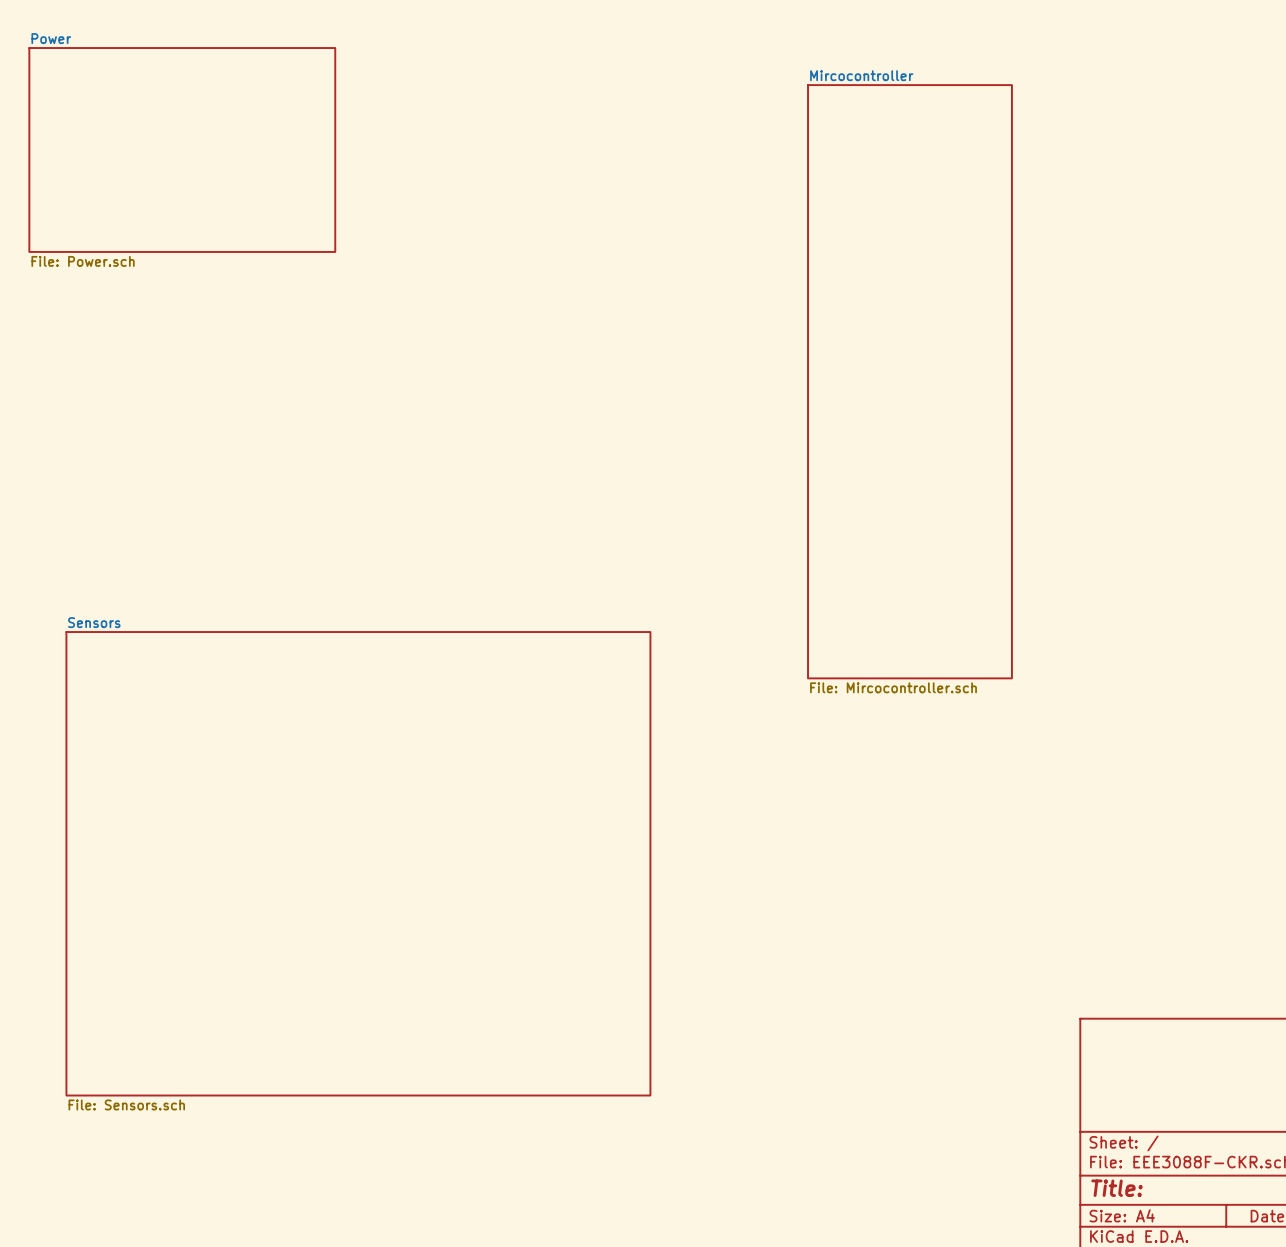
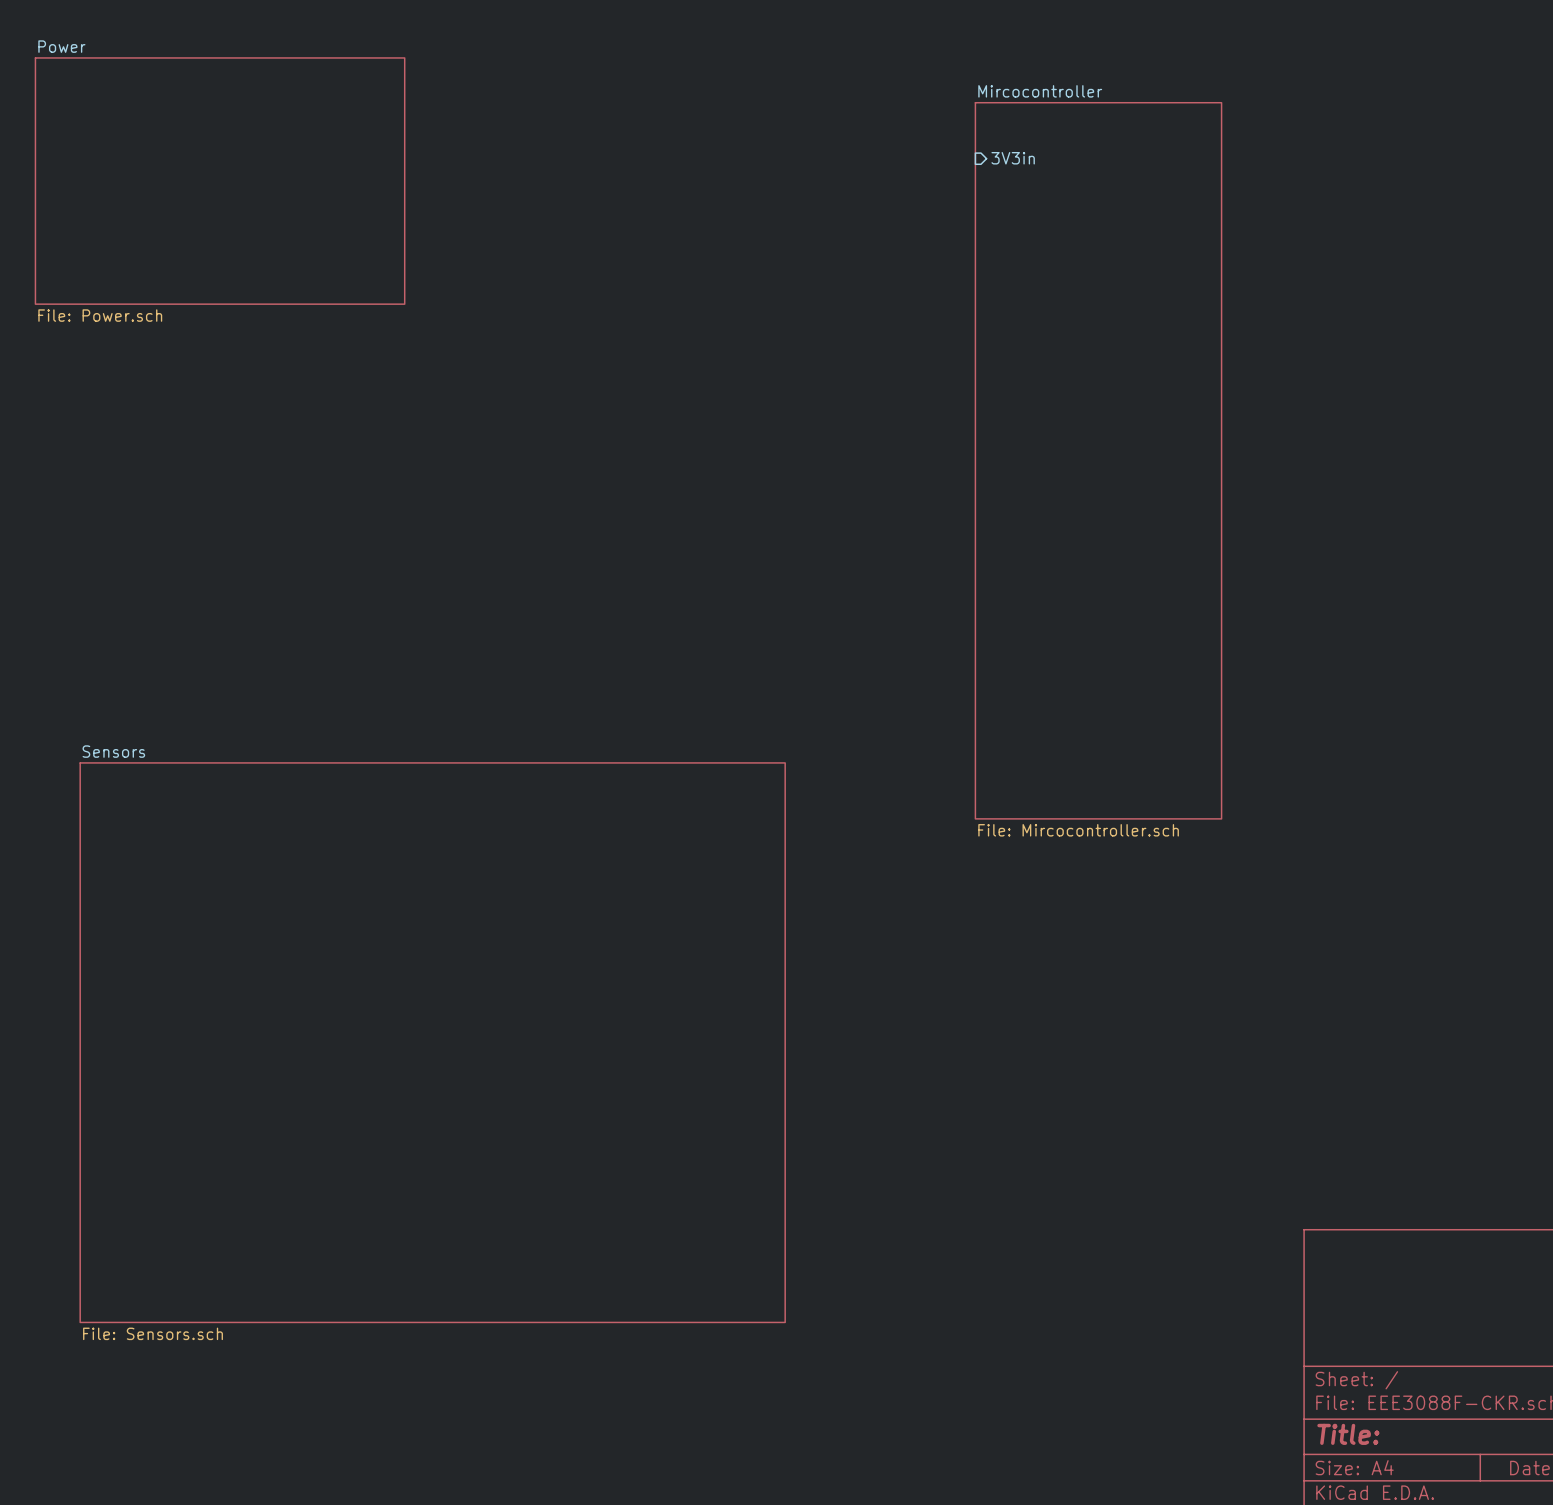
sheet pin: none -> 3V3in (1013, 158)

